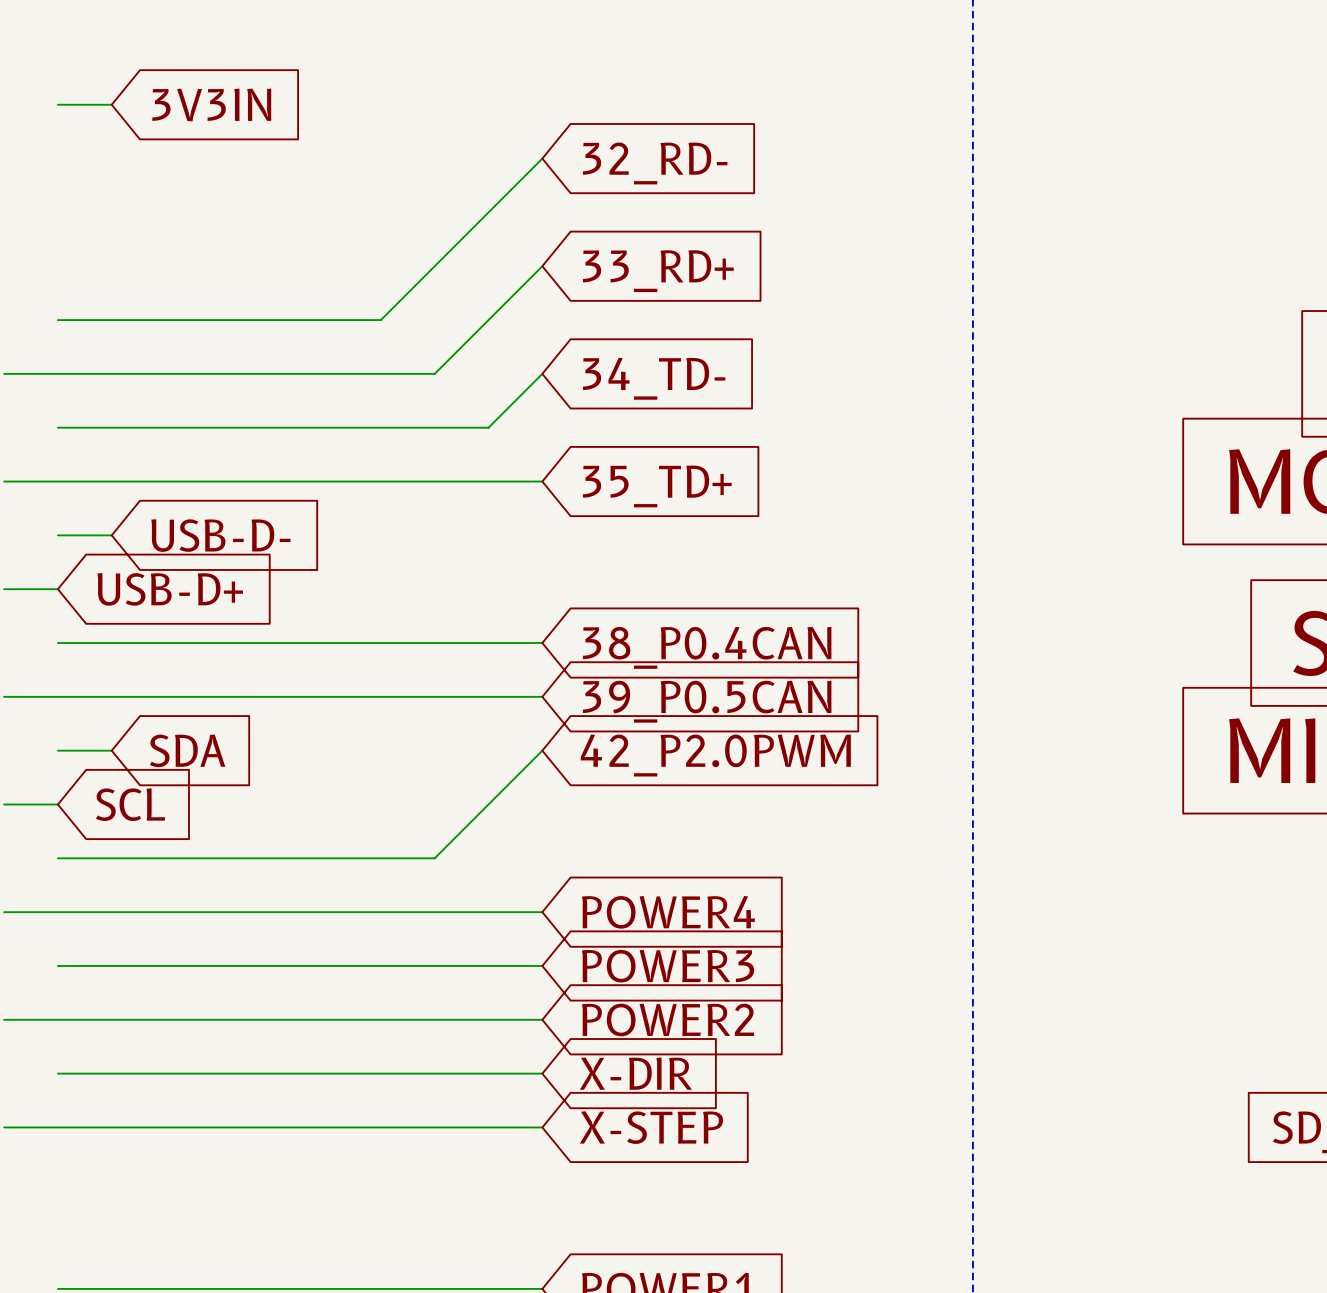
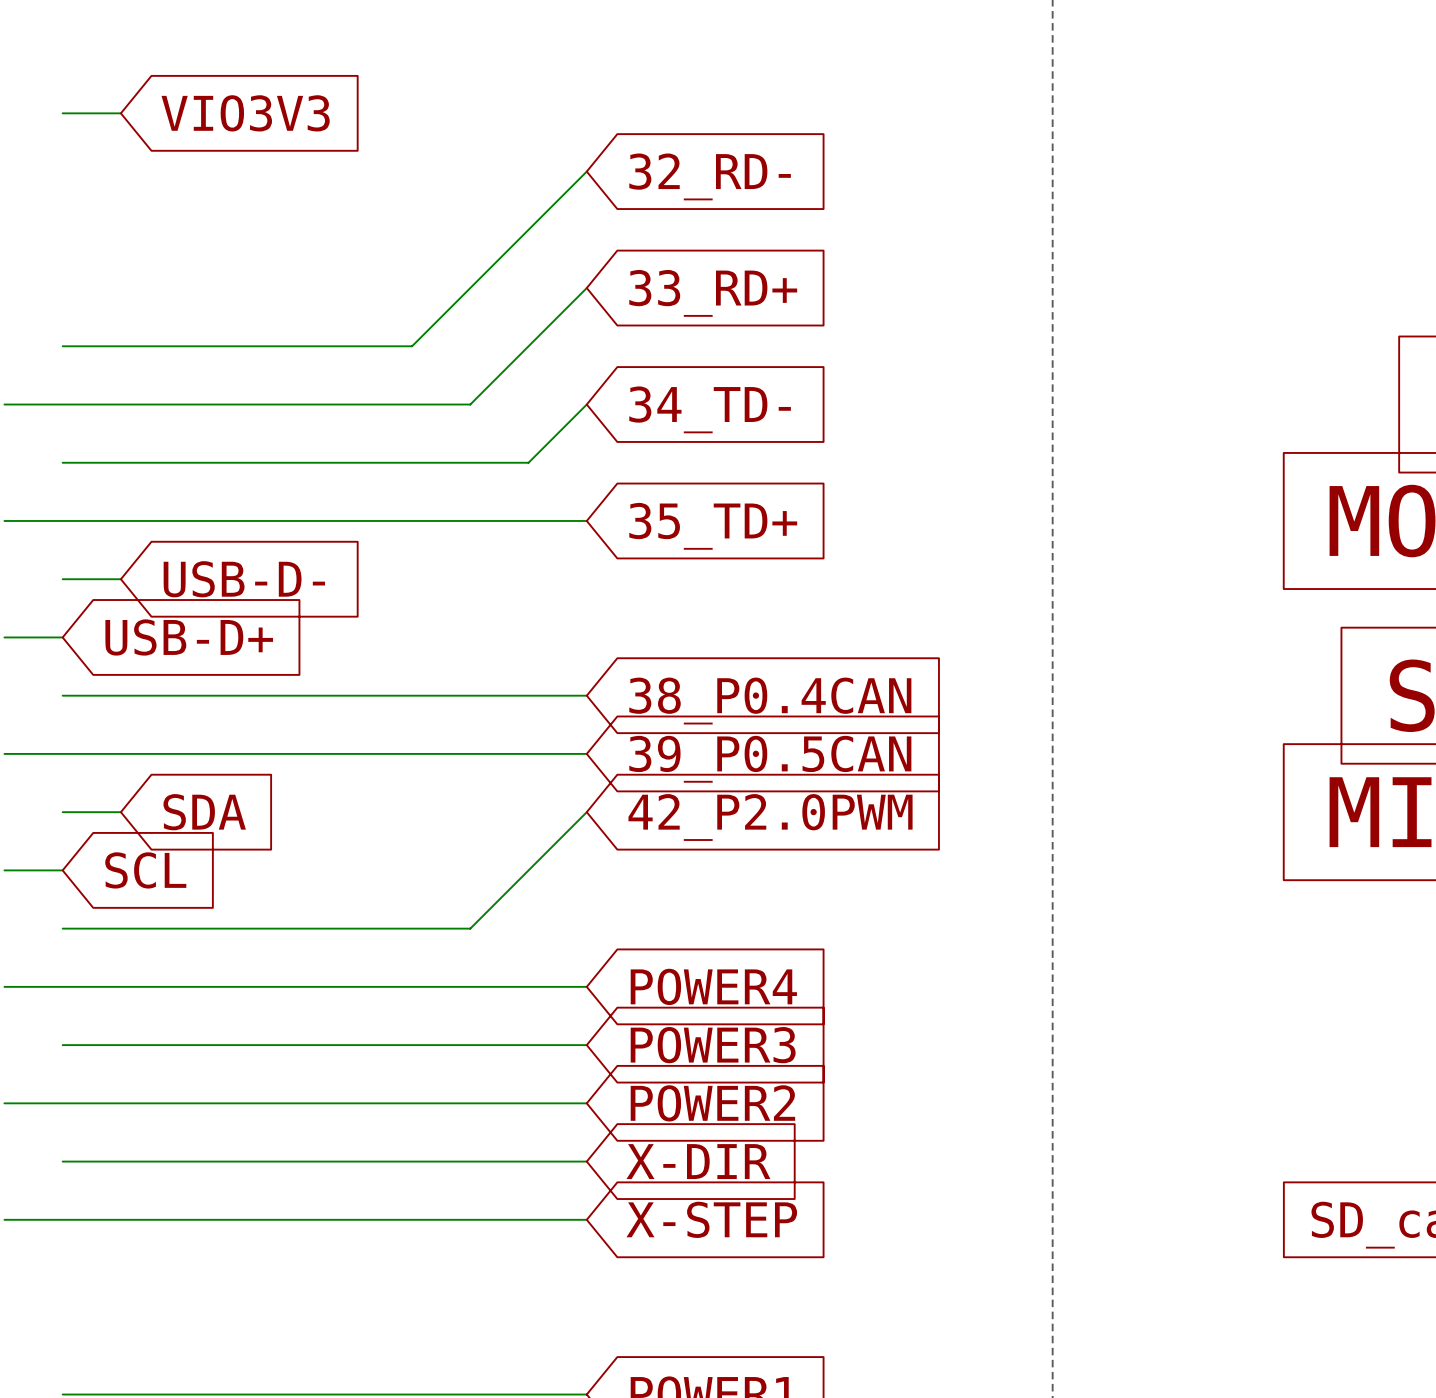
global label: 3V3IN (211, 104) -> VIO3V3 (245, 113)

